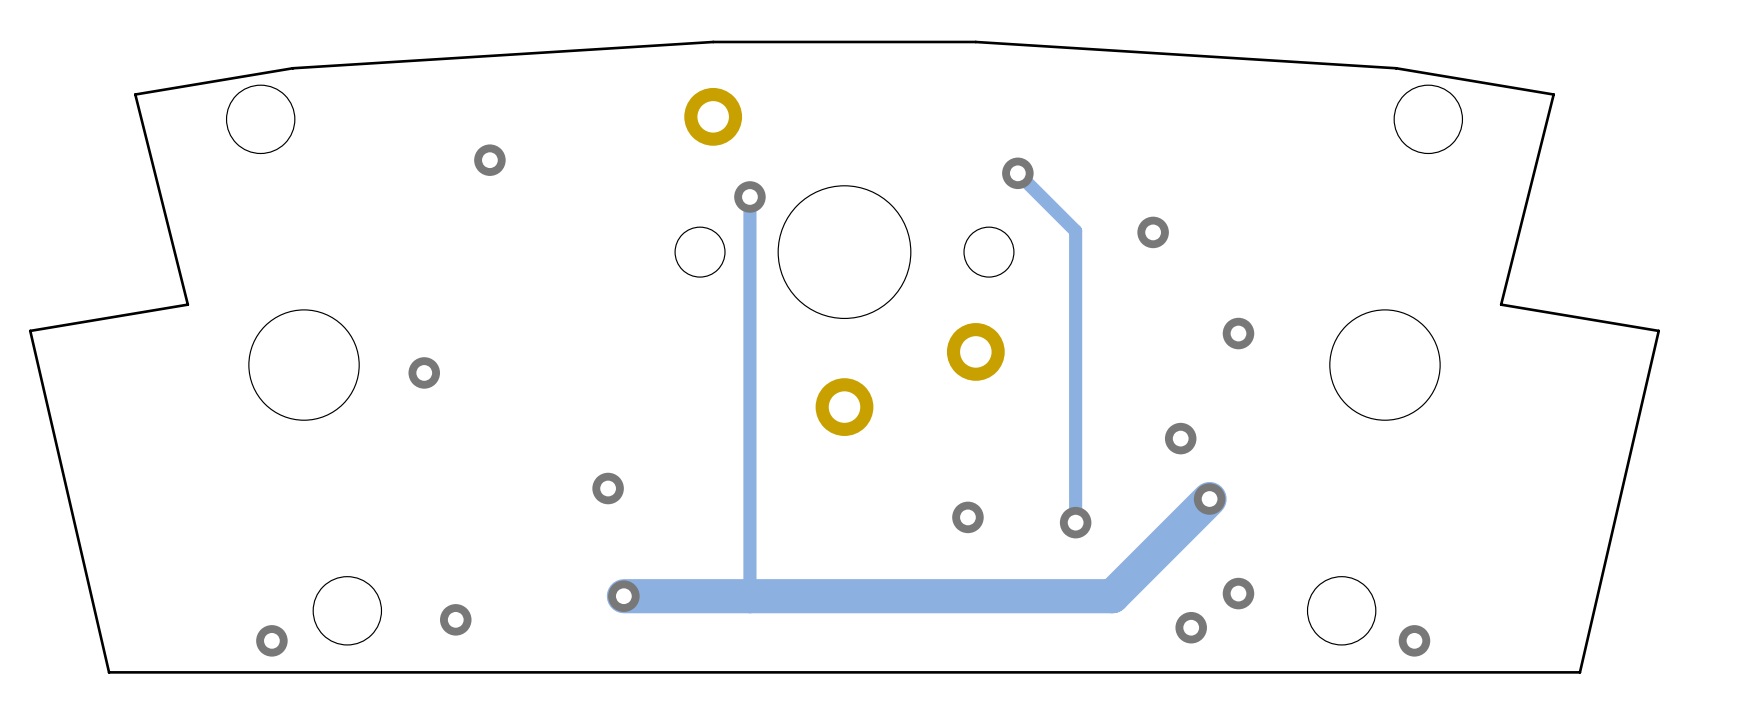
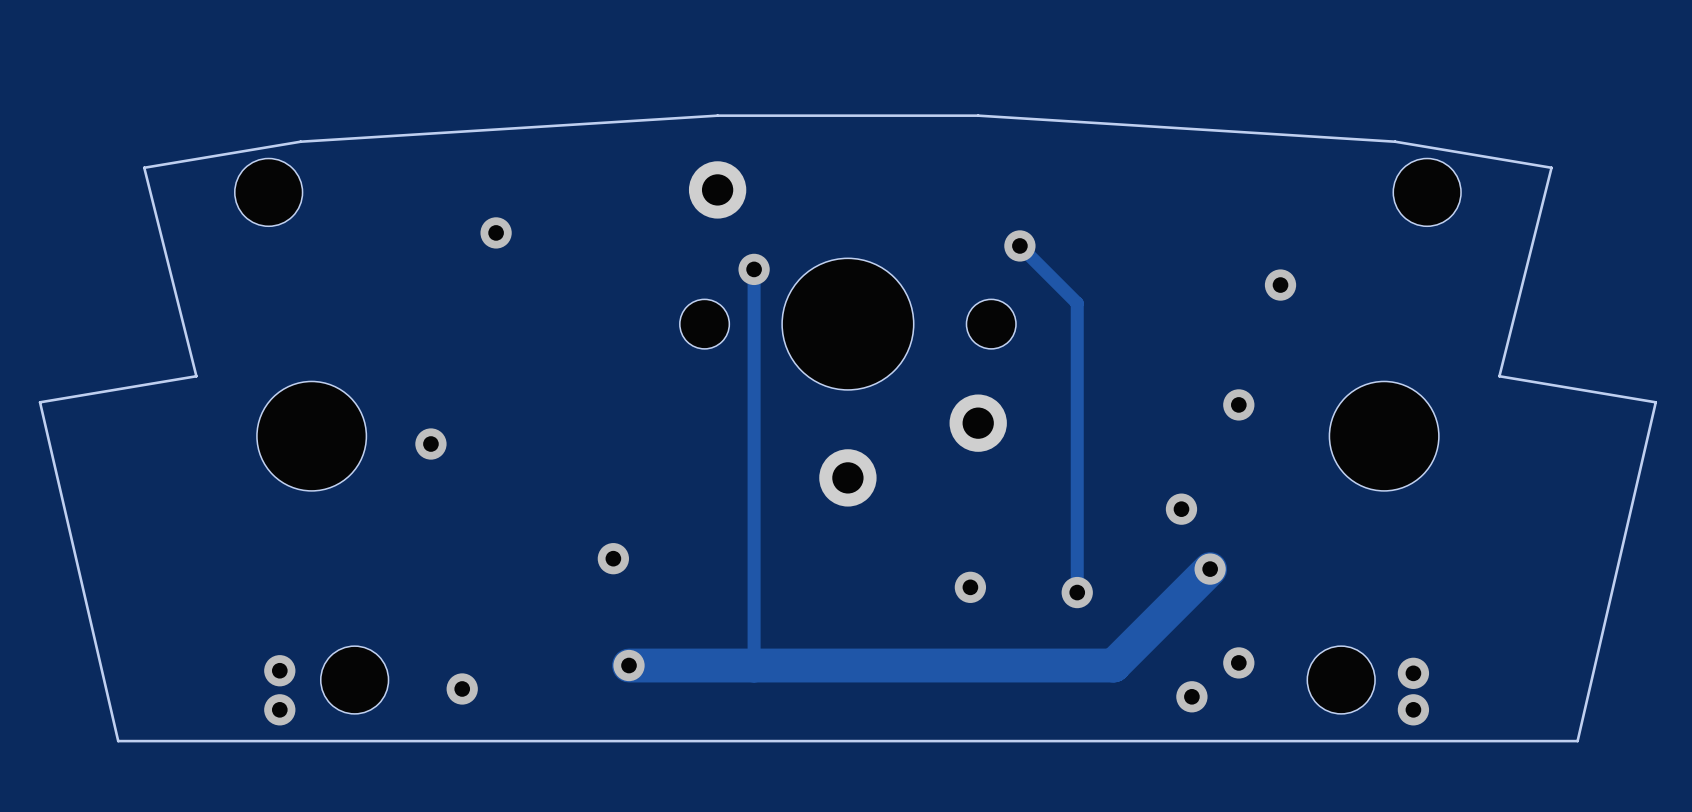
via position: (1153, 232) -> (1280, 285)
via: none -> (279, 670)
via: none -> (1413, 673)

